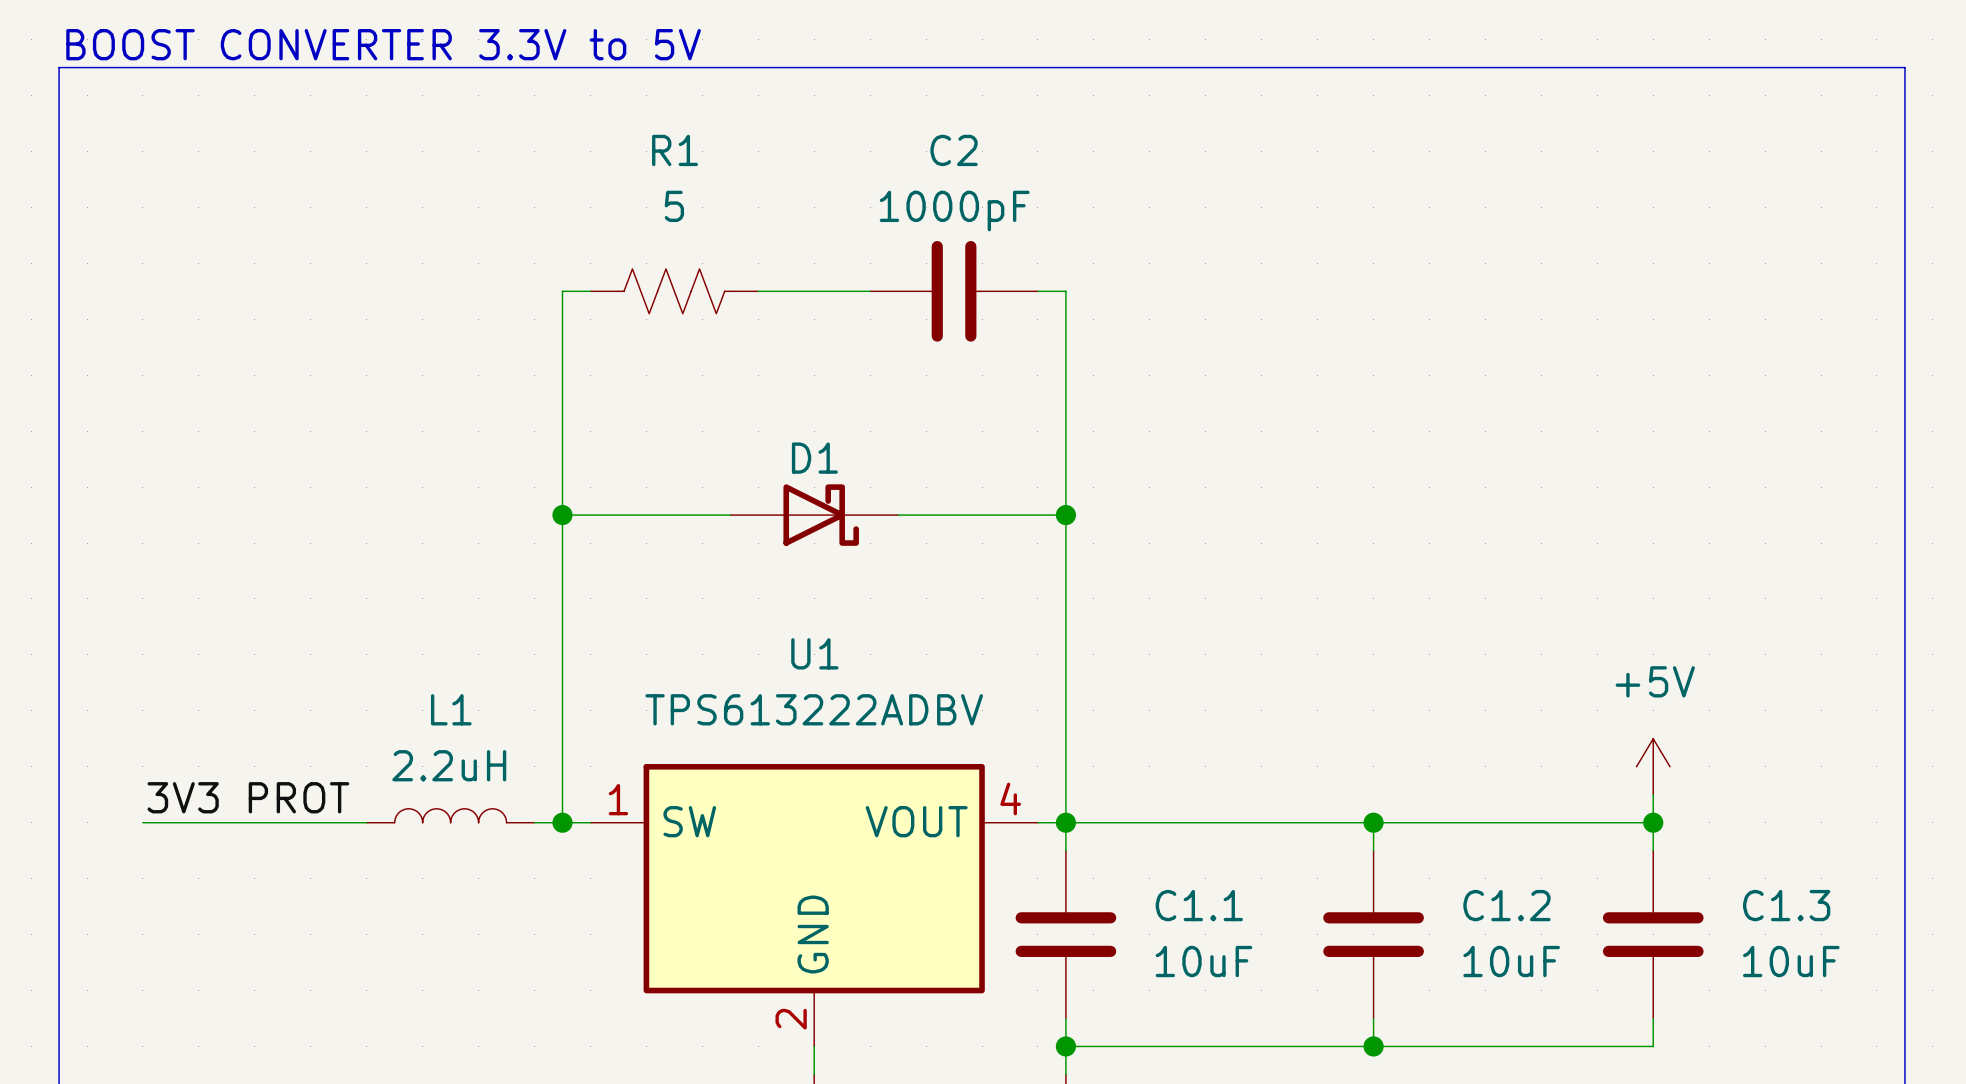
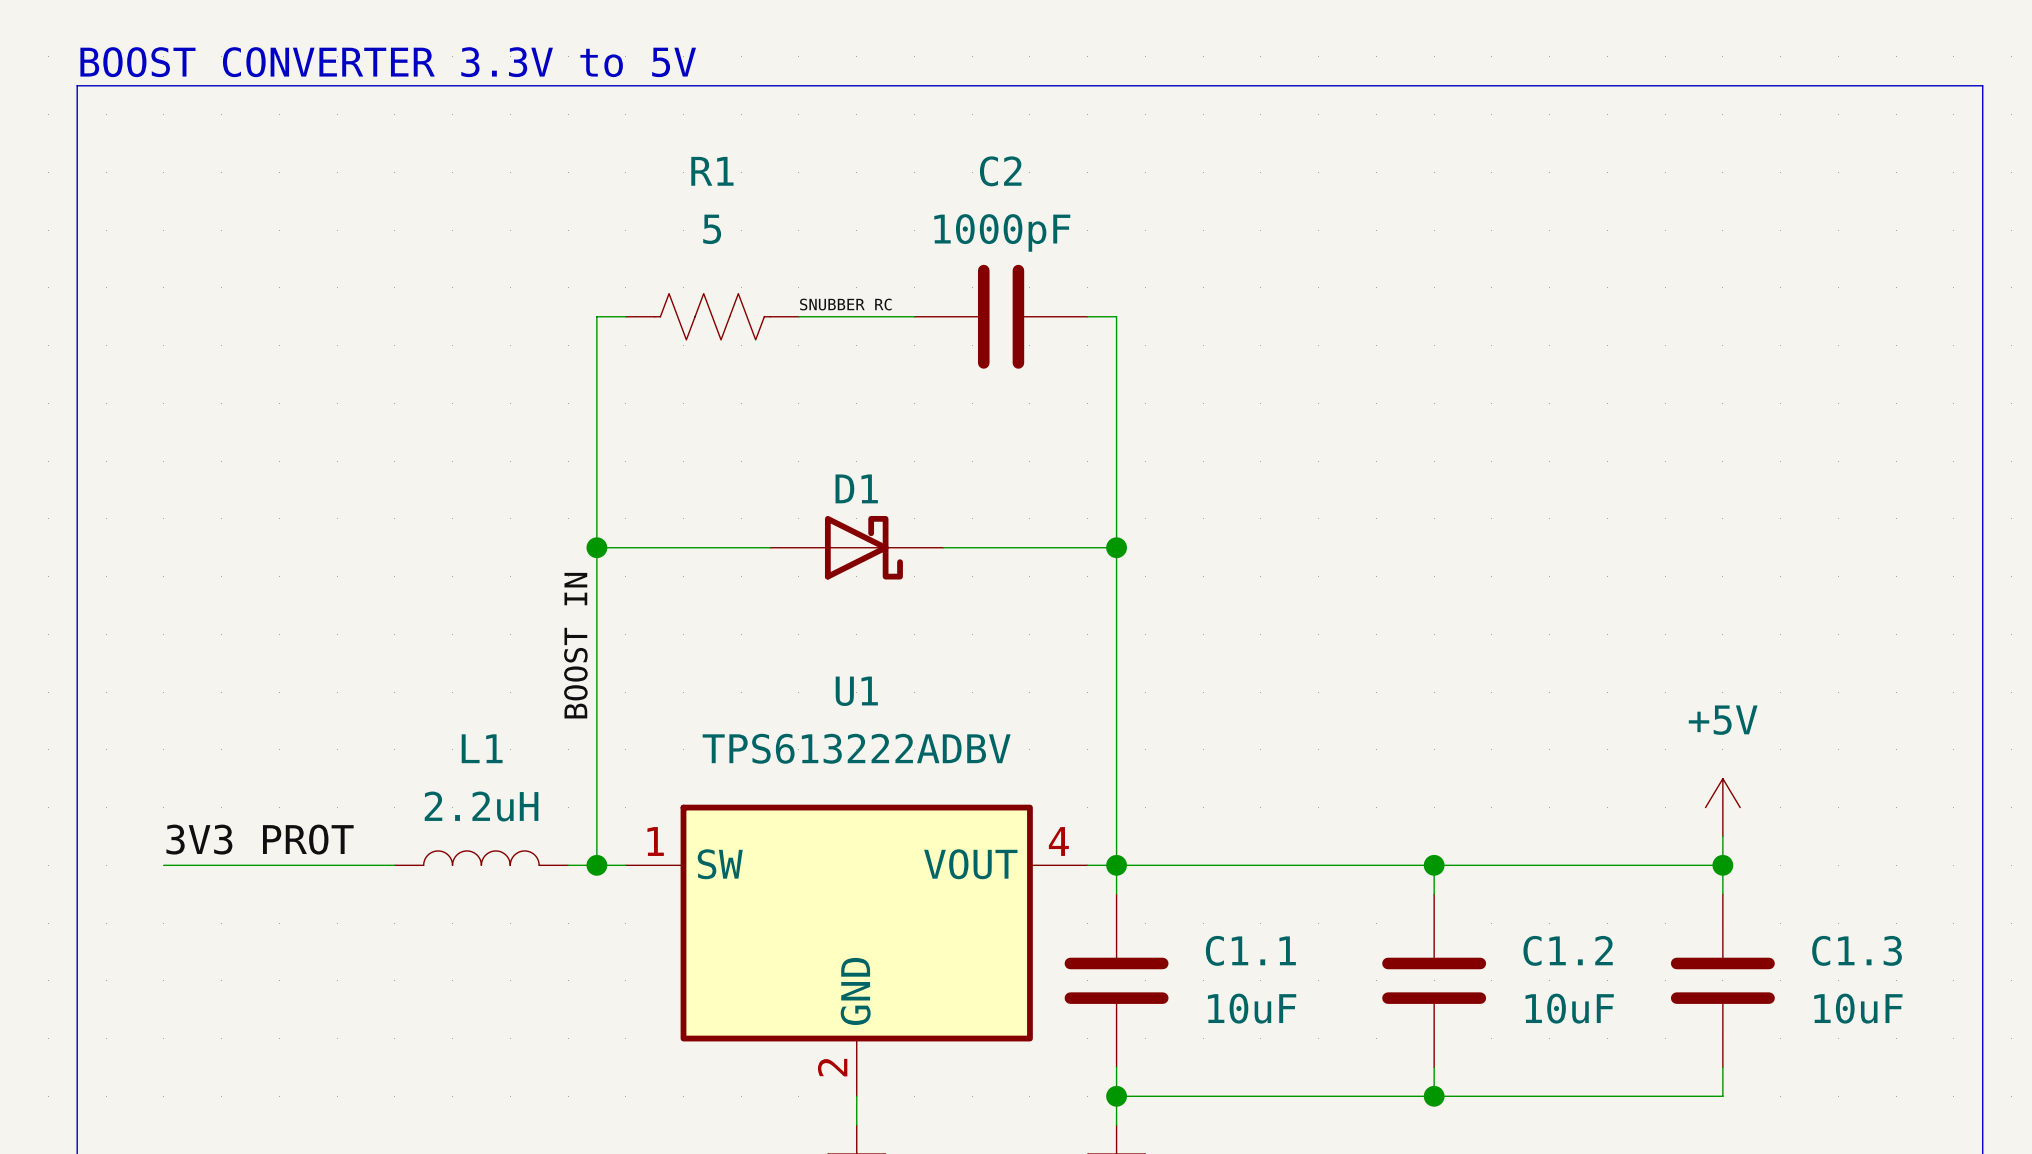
label: none -> SNUBBER RC (845, 304)
label: none -> BOOST IN (575, 645)

